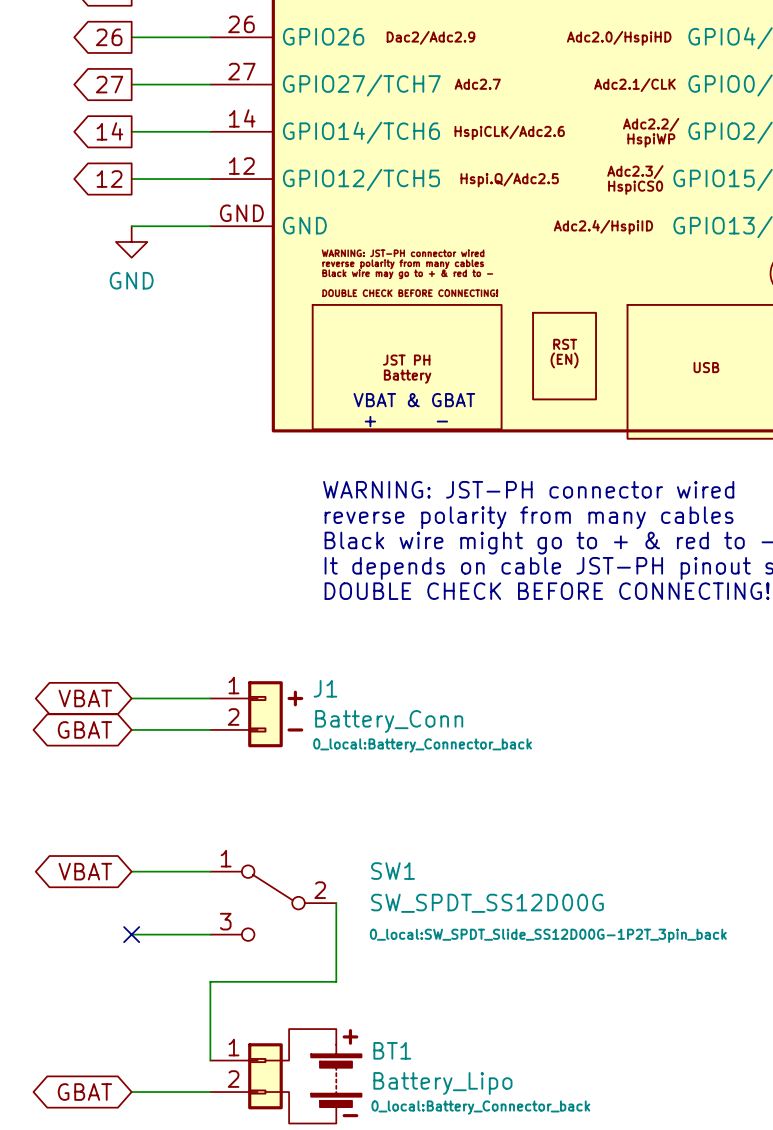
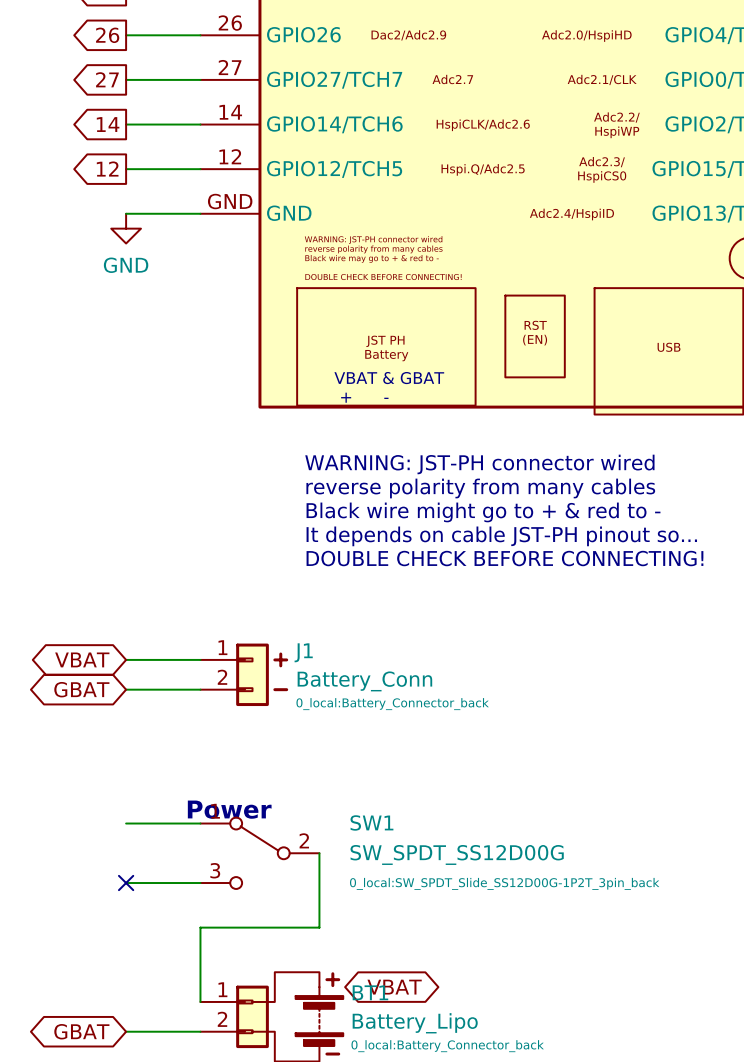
text: none -> Power (229, 809)
global label: VBAT (85, 871) -> none
global label: none -> VBAT (394, 987)

